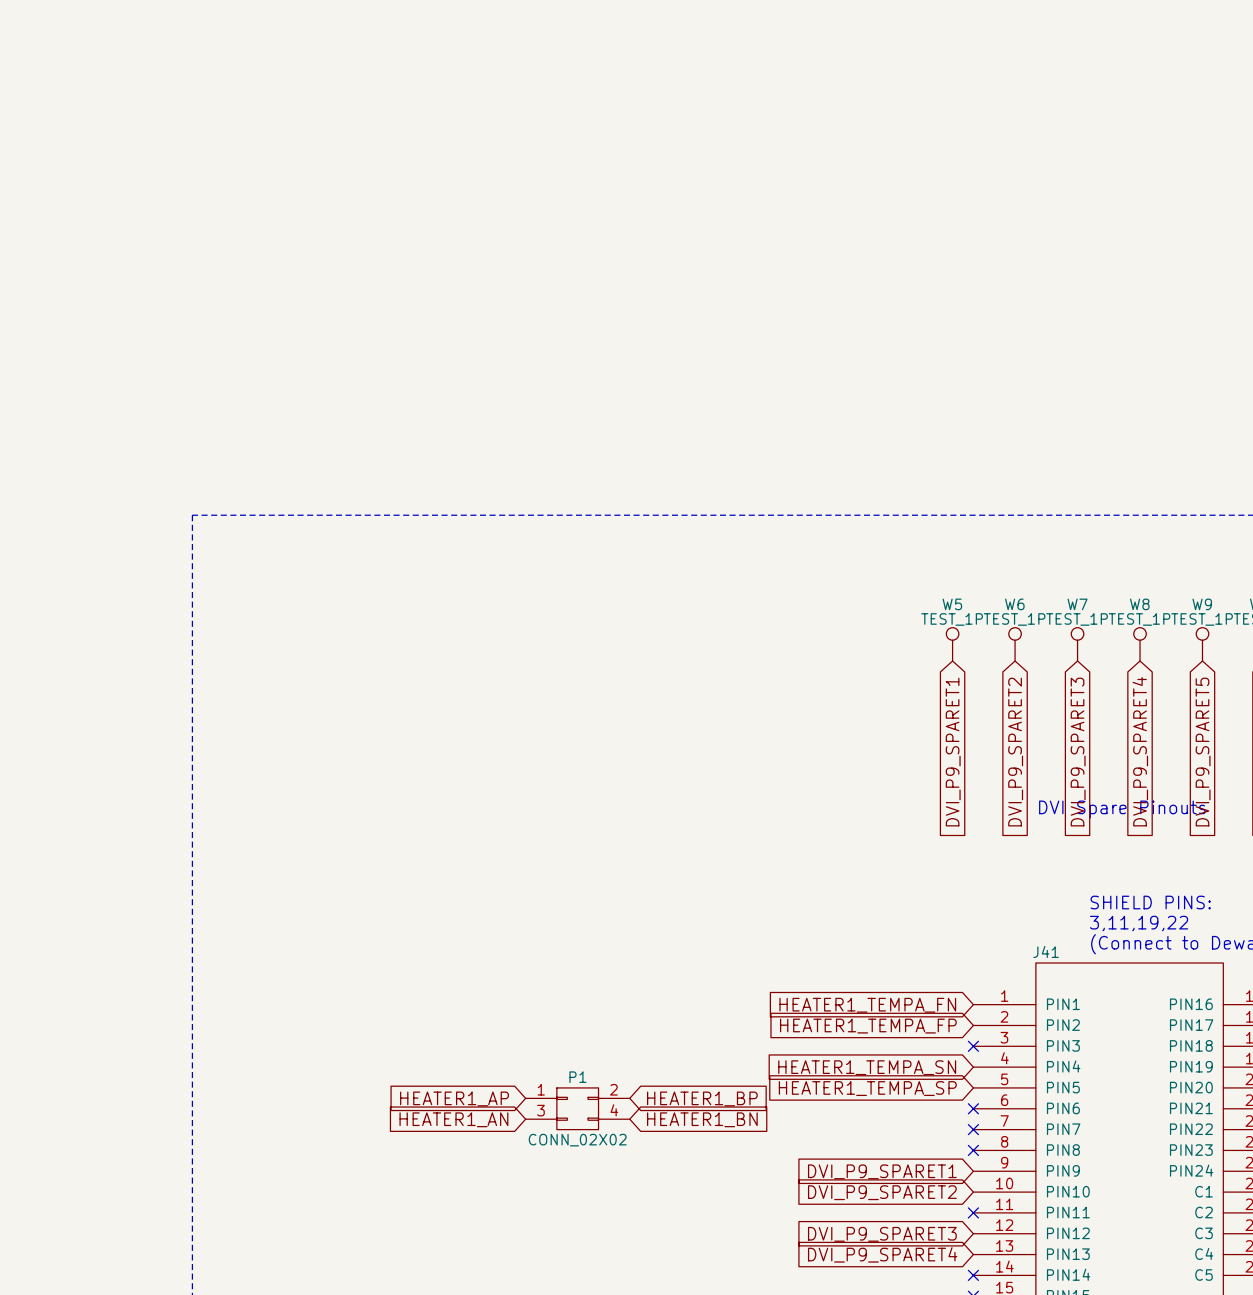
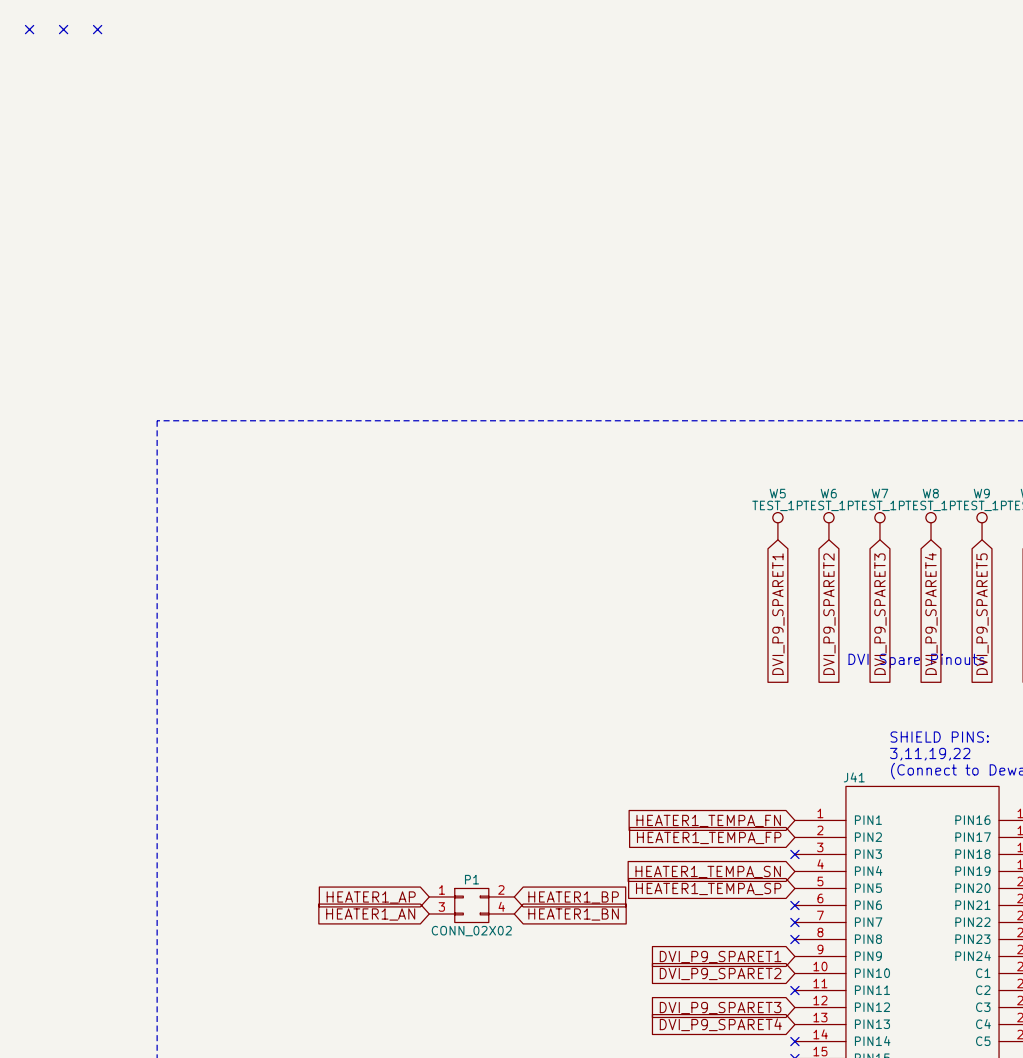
no-connect mark: none -> (29, 29)
no-connect mark: none -> (63, 29)
no-connect mark: none -> (97, 29)

